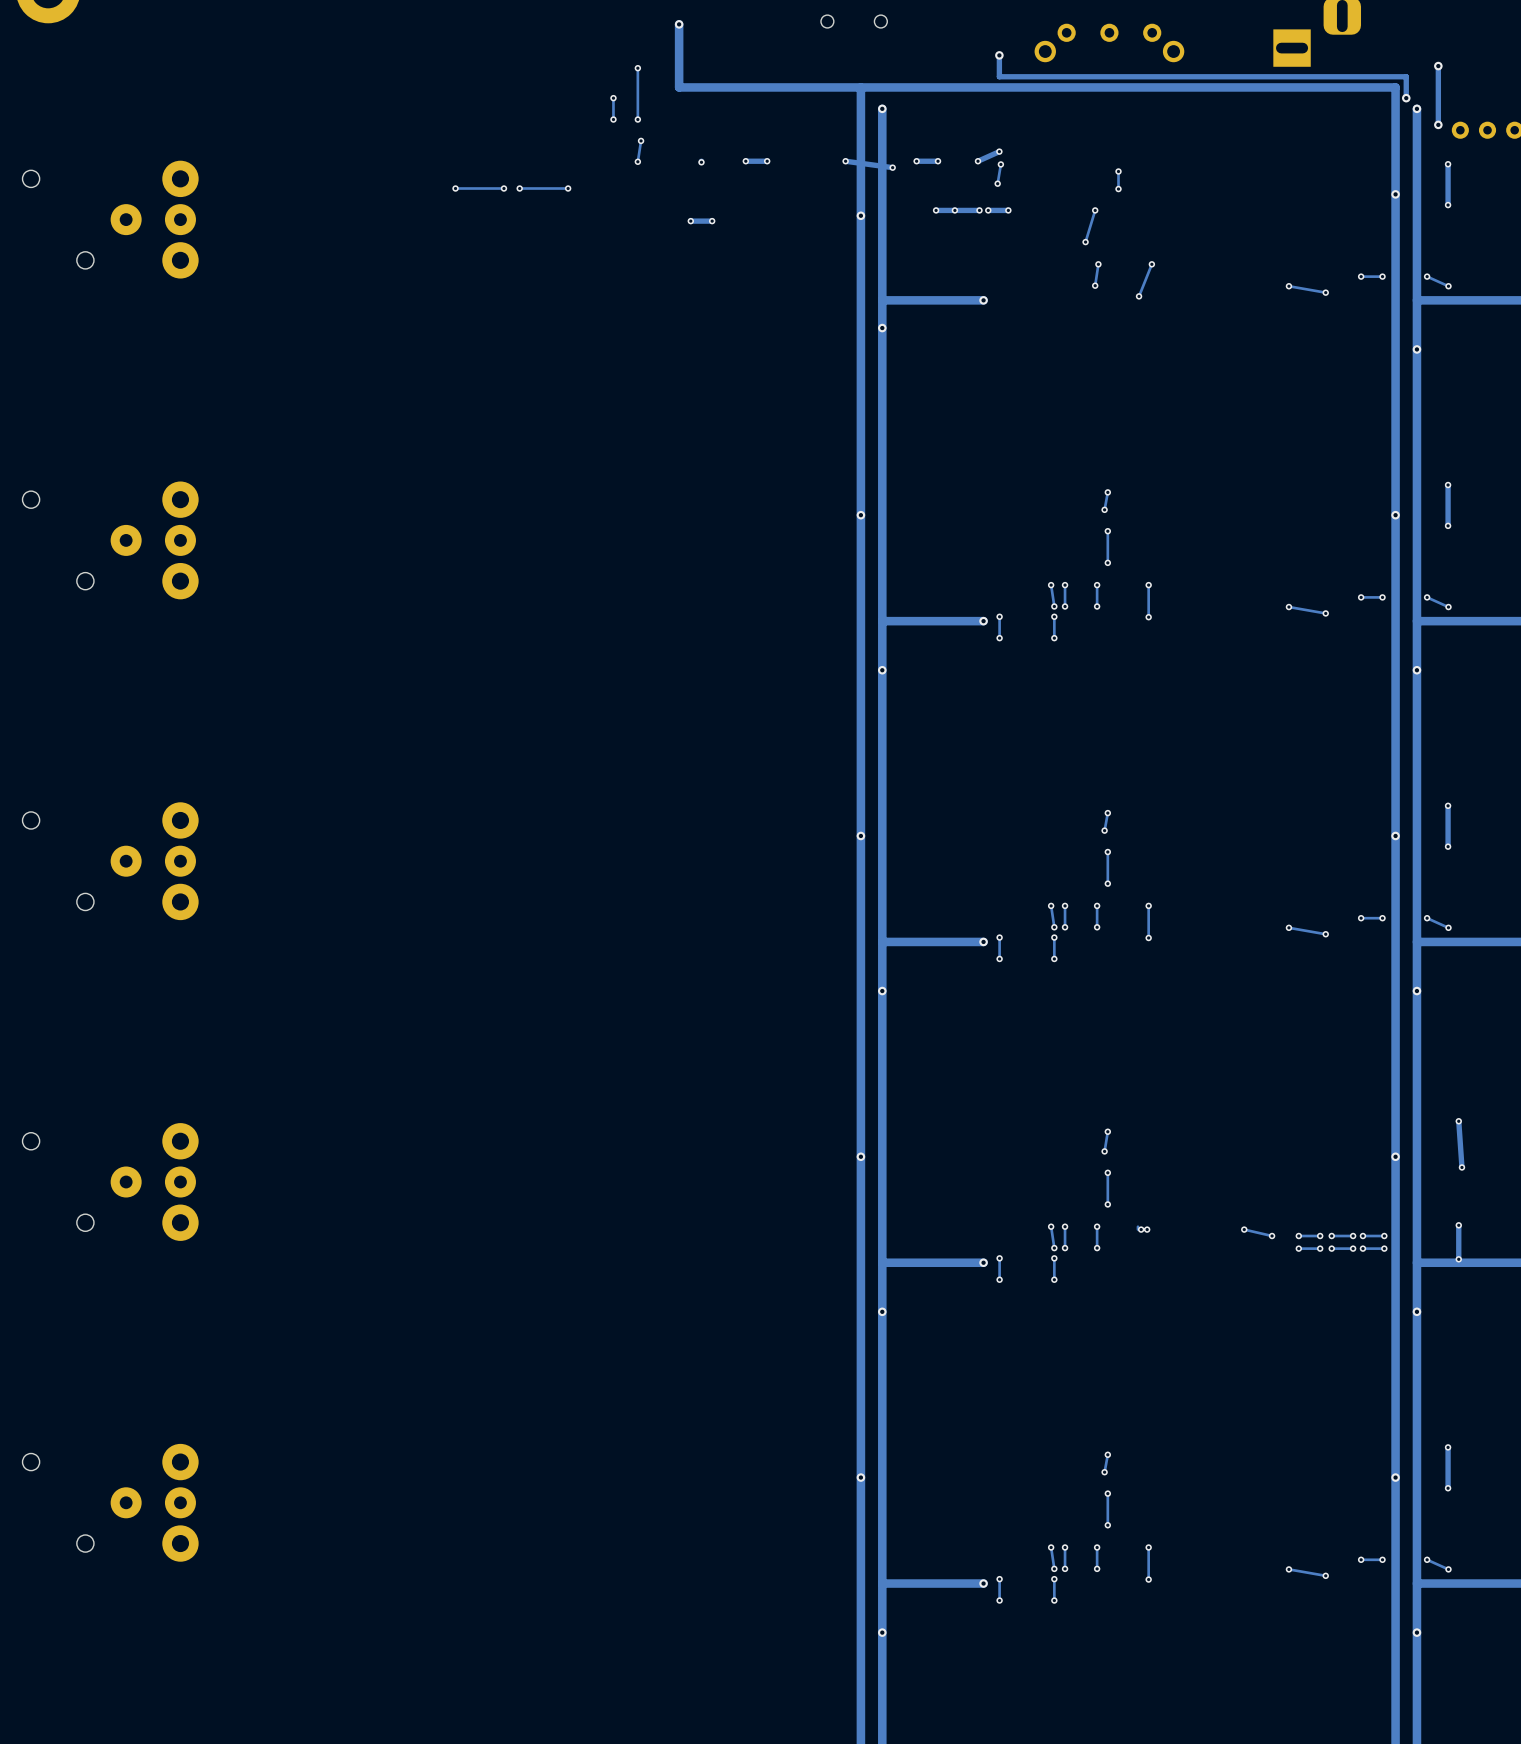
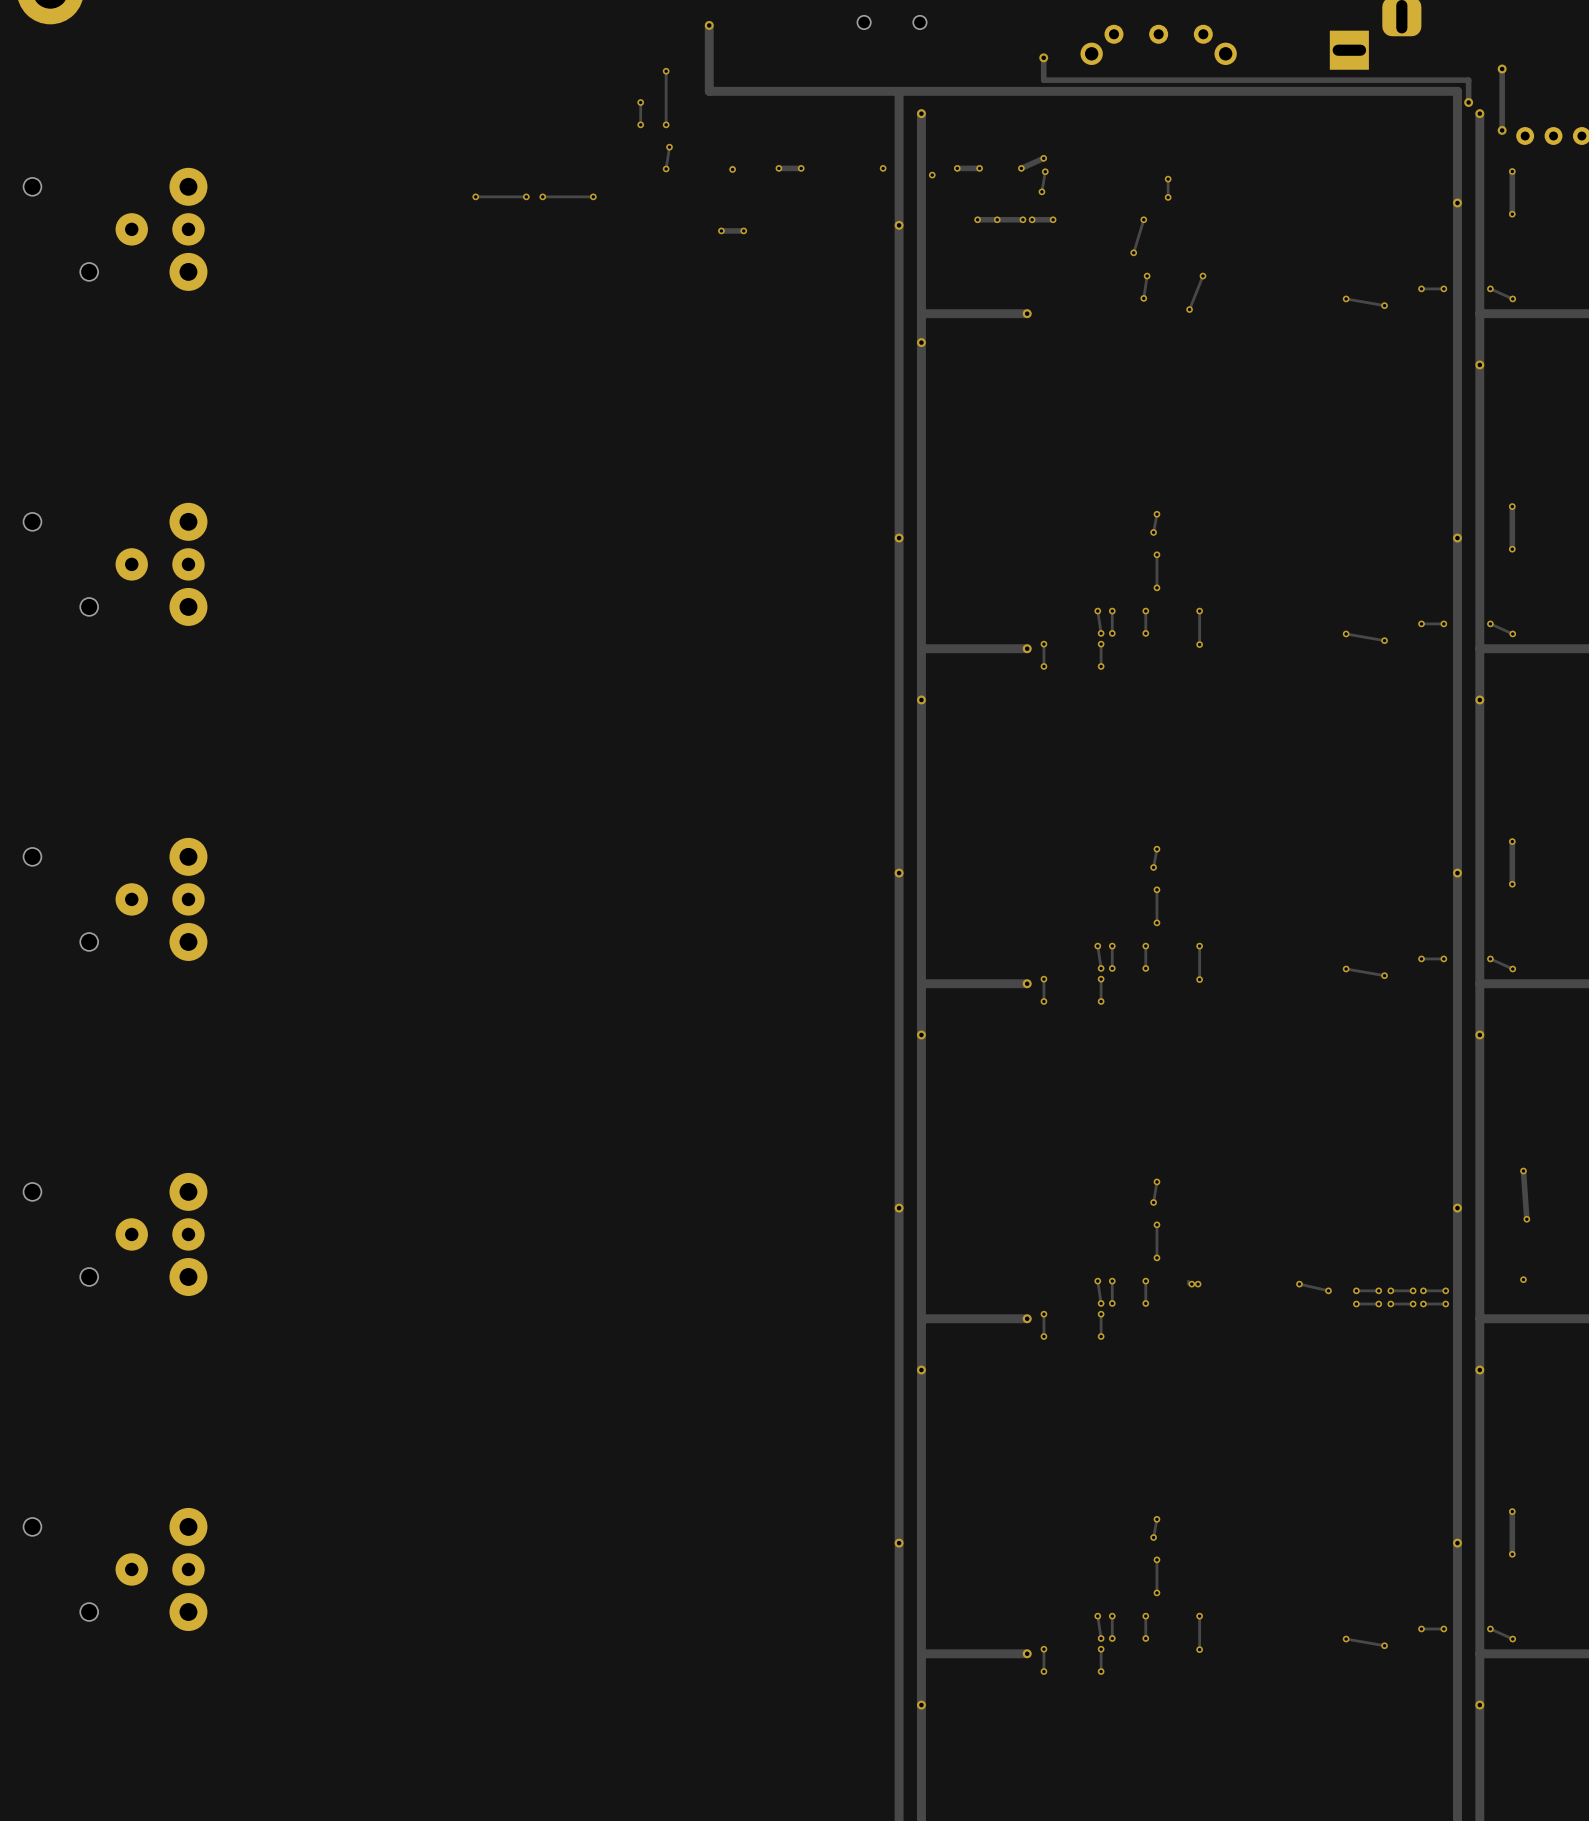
track: (845, 161) (892, 167) -> none
track: (1458, 1225) (1458, 1259) -> none
via: (1458, 1259) -> none

